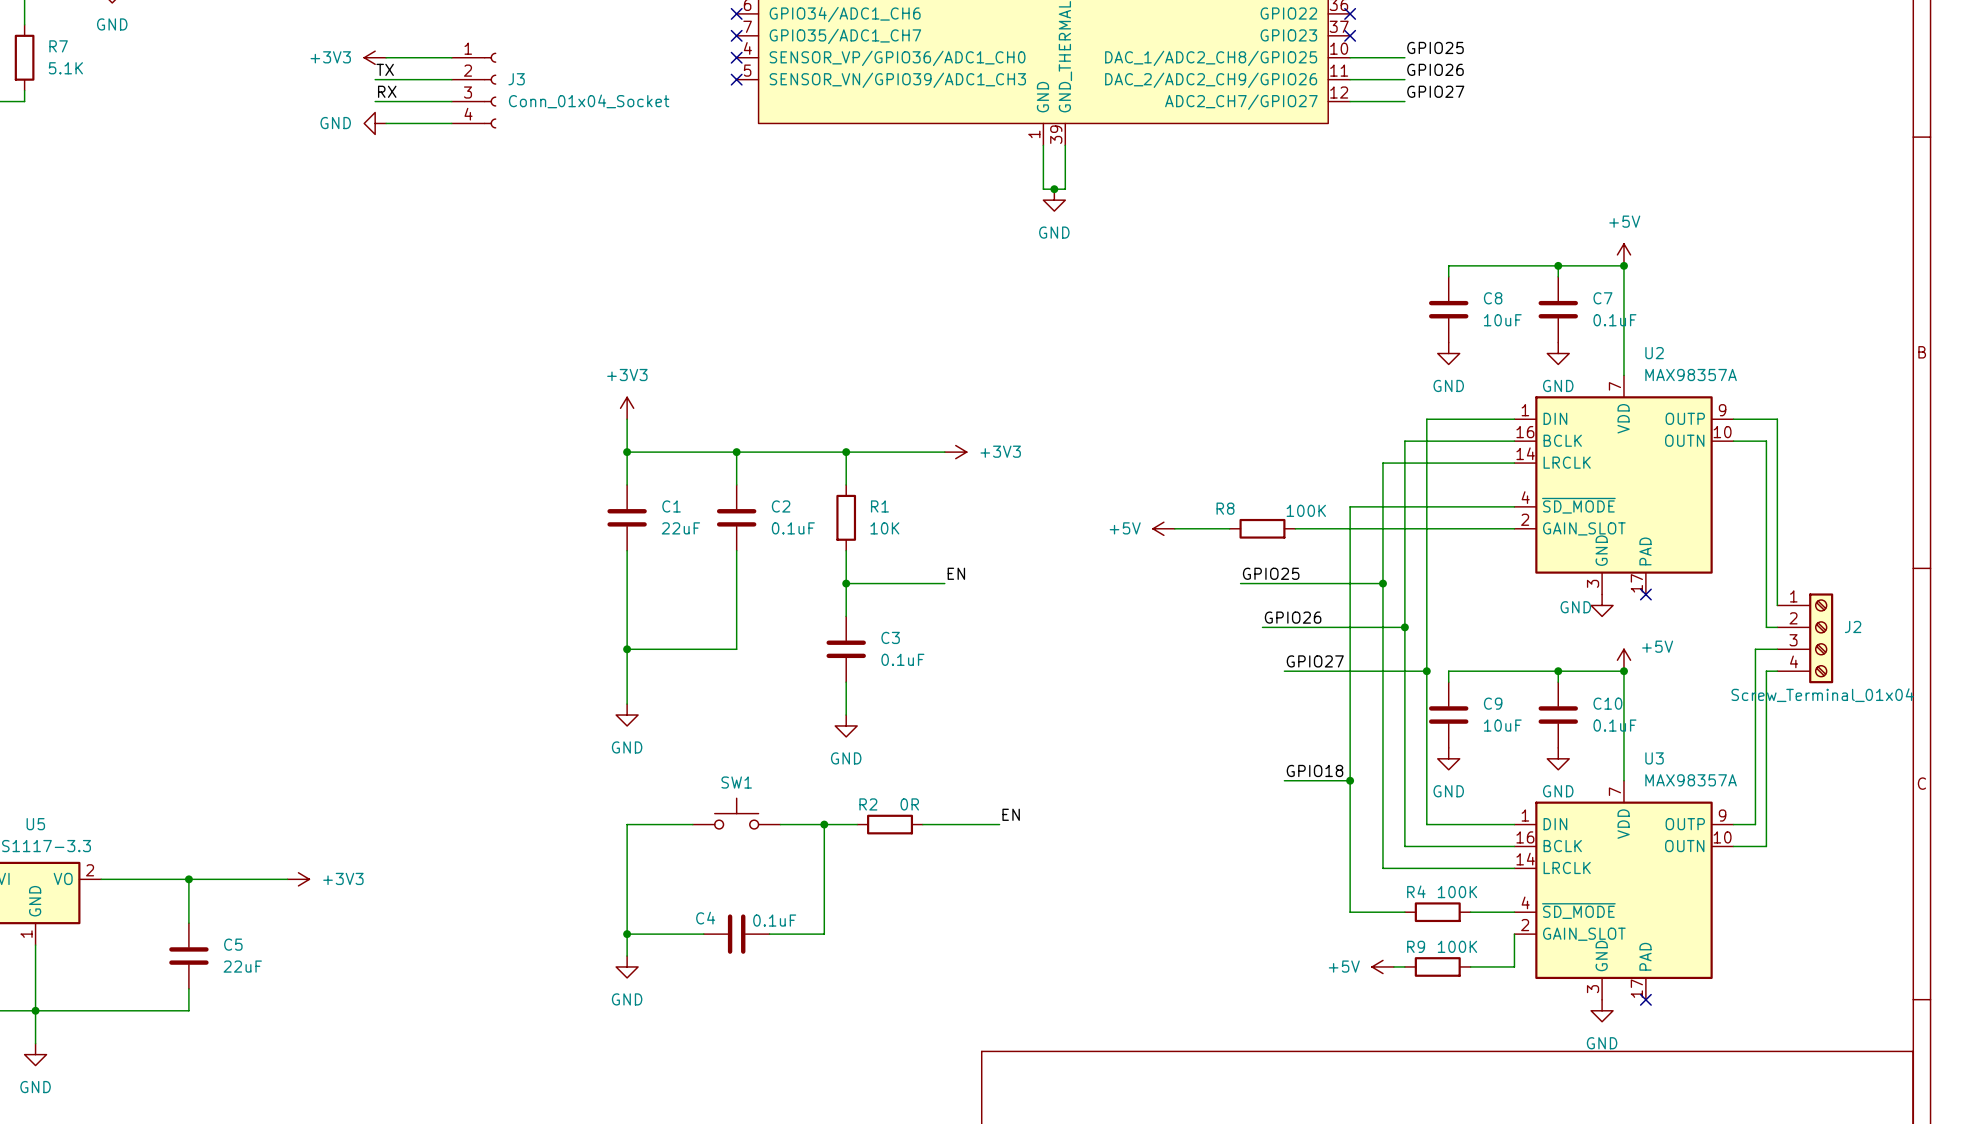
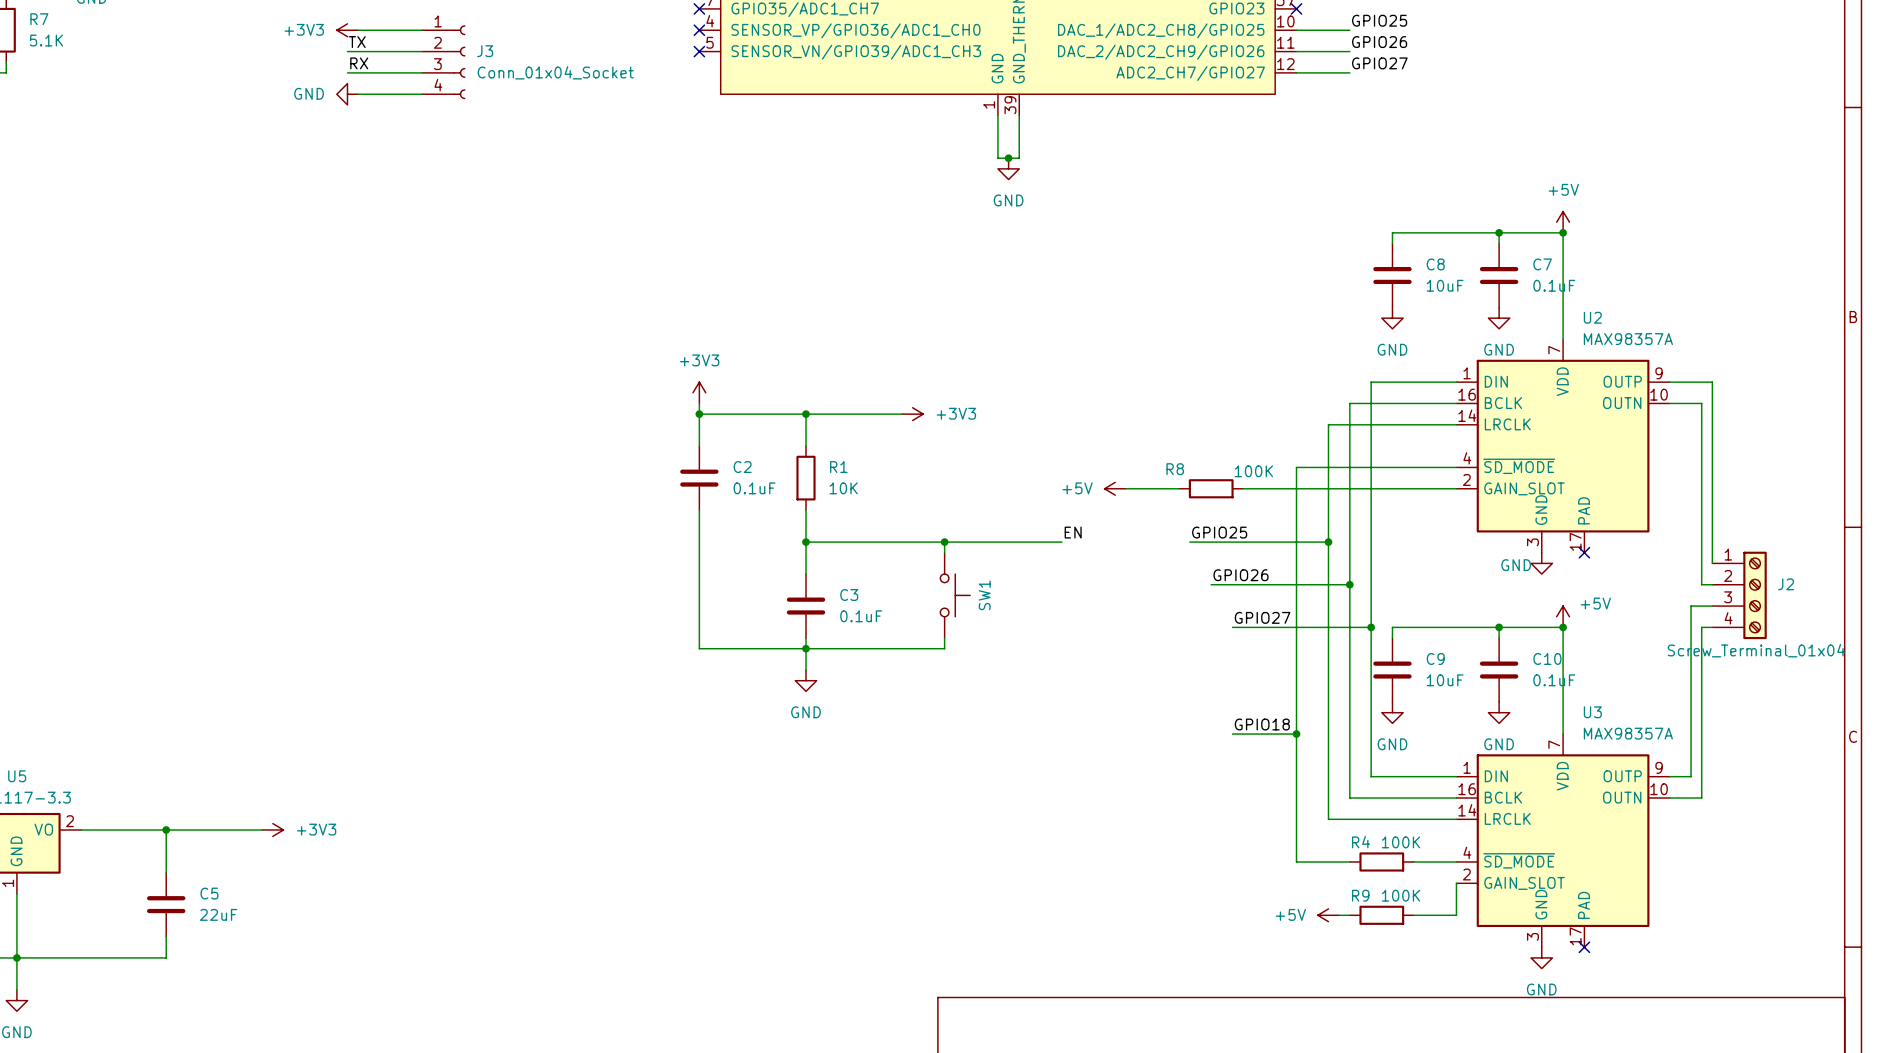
power symbol position: +3V3 (627, 408) -> +3V3 (699, 392)
wire: (627, 419) (627, 484) -> none
wire: (627, 452) (736, 452) -> (699, 403) (699, 414)
junction: (627, 452) -> none
C1: 22uF (627, 517) -> none
wire: (627, 550) (627, 704) -> none
label: EN (956, 573) -> none
label: none -> EN (1073, 532)
wire: none -> (901, 542) (1061, 542)
wire: none -> (944, 542) (944, 552)
junction: none -> (944, 542)
wire: (627, 649) (736, 649) -> (944, 638) (944, 648) (699, 648) (699, 606)
junction: (627, 649) -> none
junction: none -> (806, 648)
power symbol: GND (627, 715) -> none
SW1 rotation: 0° (736, 813) -> 90° clockwise (955, 595)
SW1 position: (736, 813) -> (955, 595)
label: EN (1011, 814) -> none
wire: (692, 824) (627, 824) (627, 956) -> none
wire: (780, 824) (857, 824) -> none
wire: (824, 824) (824, 934) (769, 934) -> none
junction: (824, 824) -> none
R2: 0R (890, 824) -> none
wire: (922, 824) (999, 824) -> none
wire: (627, 934) (703, 934) -> none
junction: (627, 934) -> none
C4: 0.1uF (736, 934) -> none
power symbol: GND (627, 966) -> none

